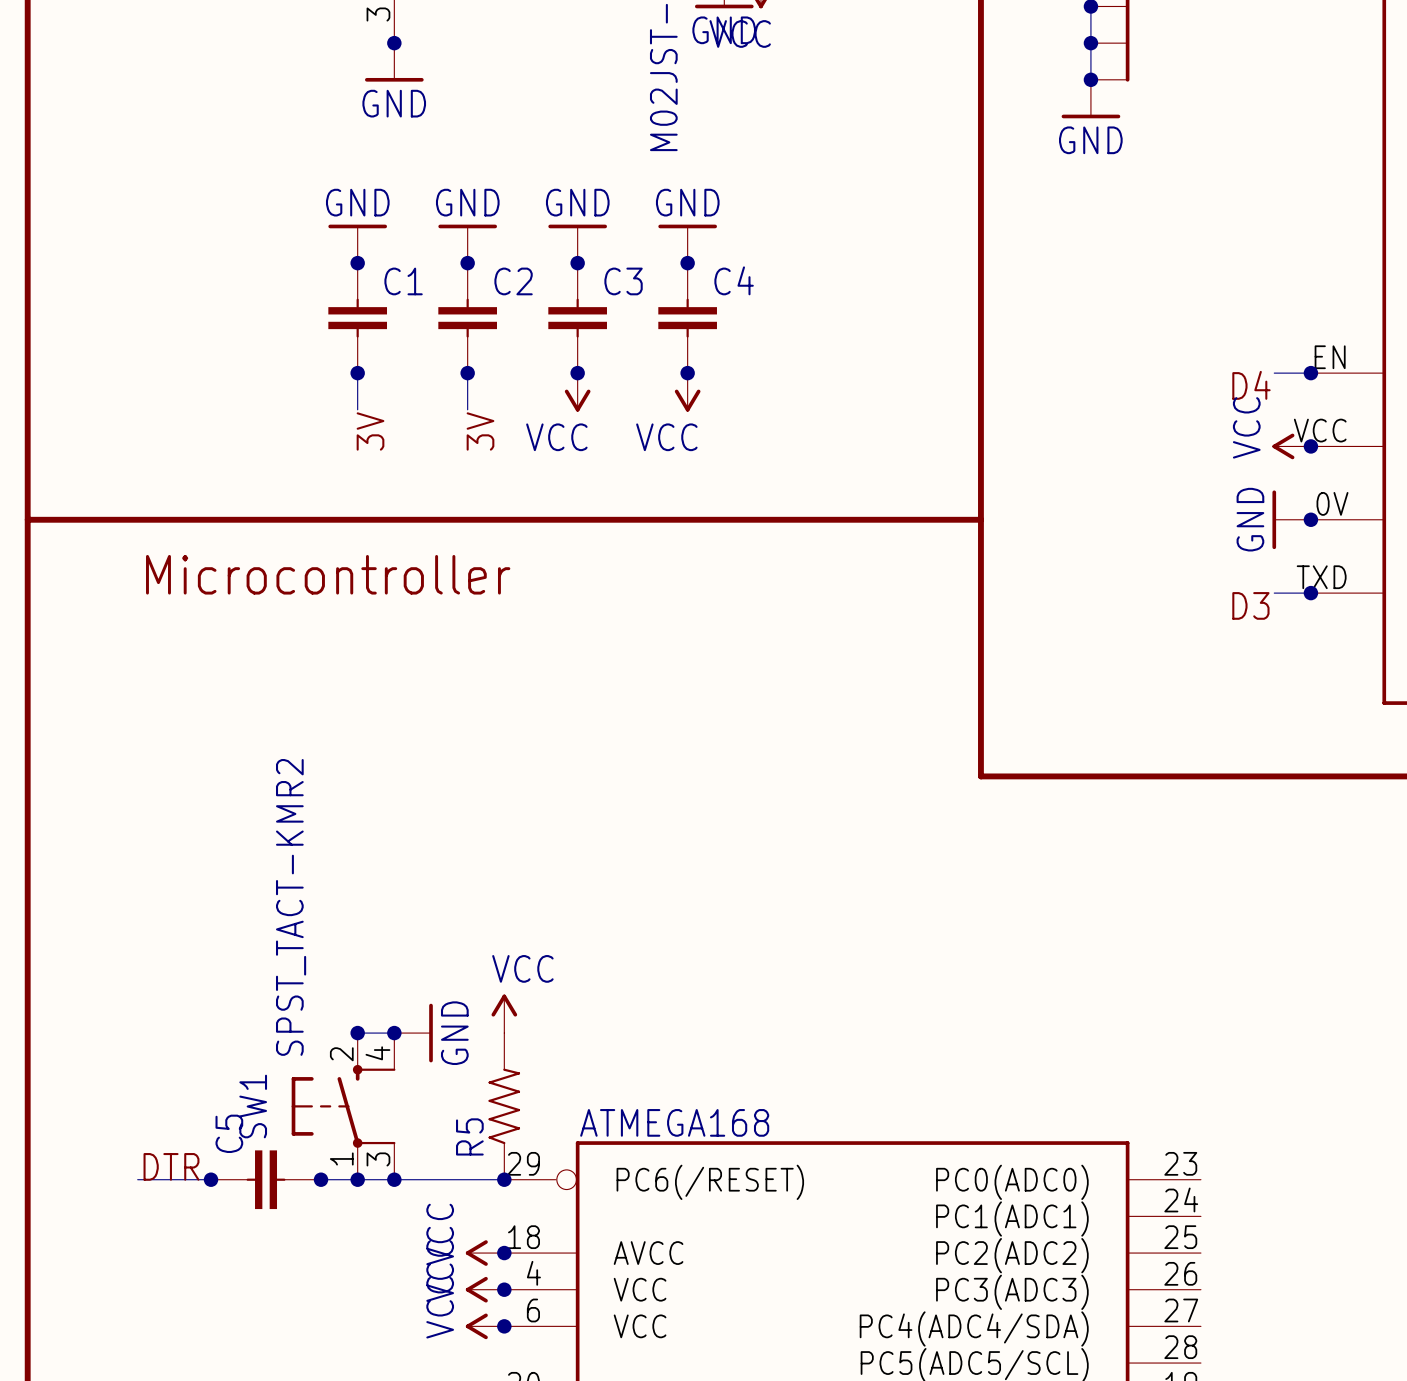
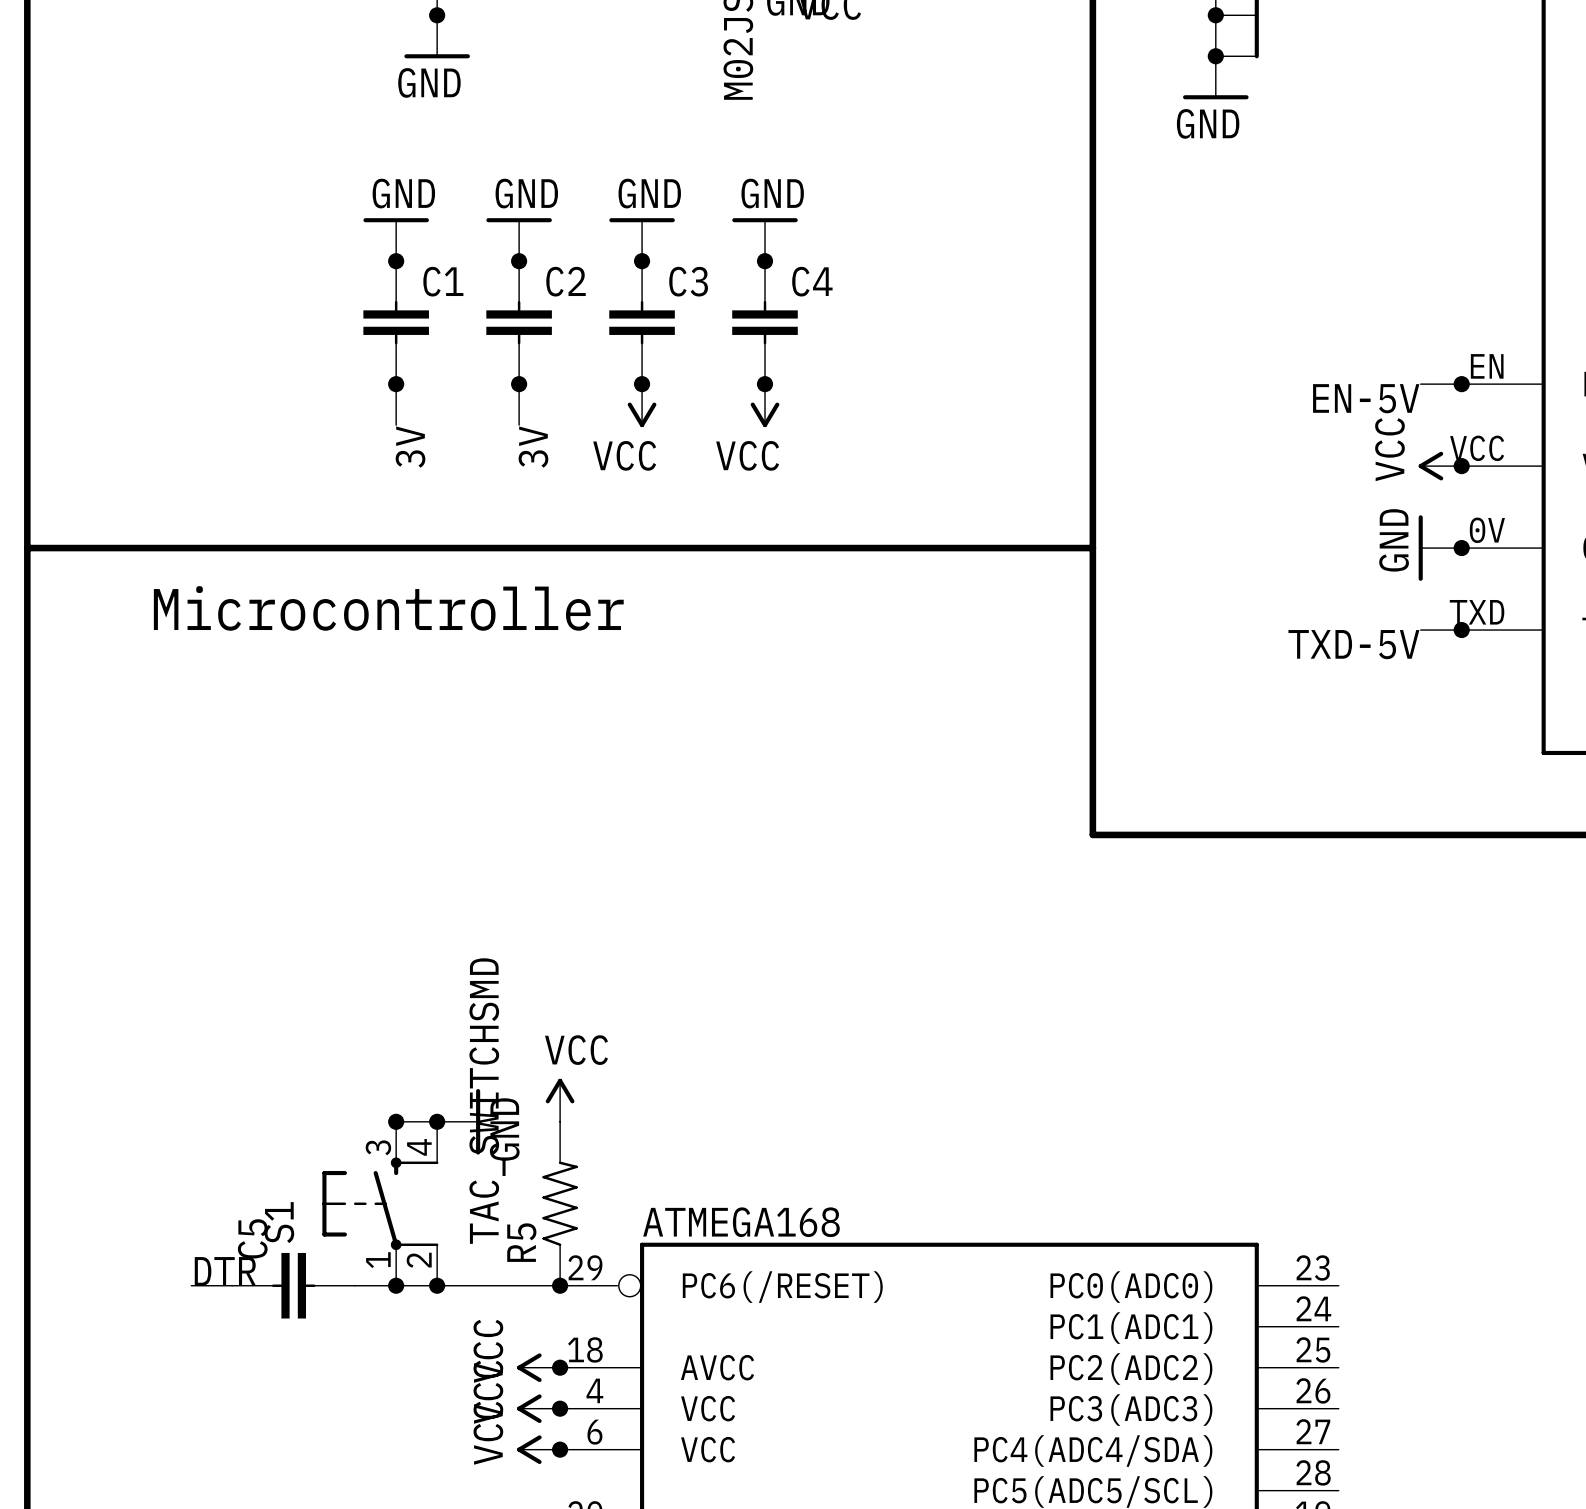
label: D4 (1251, 385) -> EN-5V (1366, 398)
label: D3 (1250, 605) -> TXD-5V (1353, 644)
SW1 value: SPST_TACT-KMR2 (291, 907) -> TAC_SWITCHSMD (487, 1101)
SW1 pin number: 2 (341, 1054) -> 3 (378, 1147)
SW1 name: SW1 (253, 1106) -> S1 (279, 1222)
SW1 pin number: 3 (378, 1159) -> 2 (419, 1260)
label position: DTR (171, 1166) -> DTR (225, 1271)
wire: (137, 1179) (174, 1179) -> none
junction: (211, 1179) -> none
junction: (321, 1179) -> none

